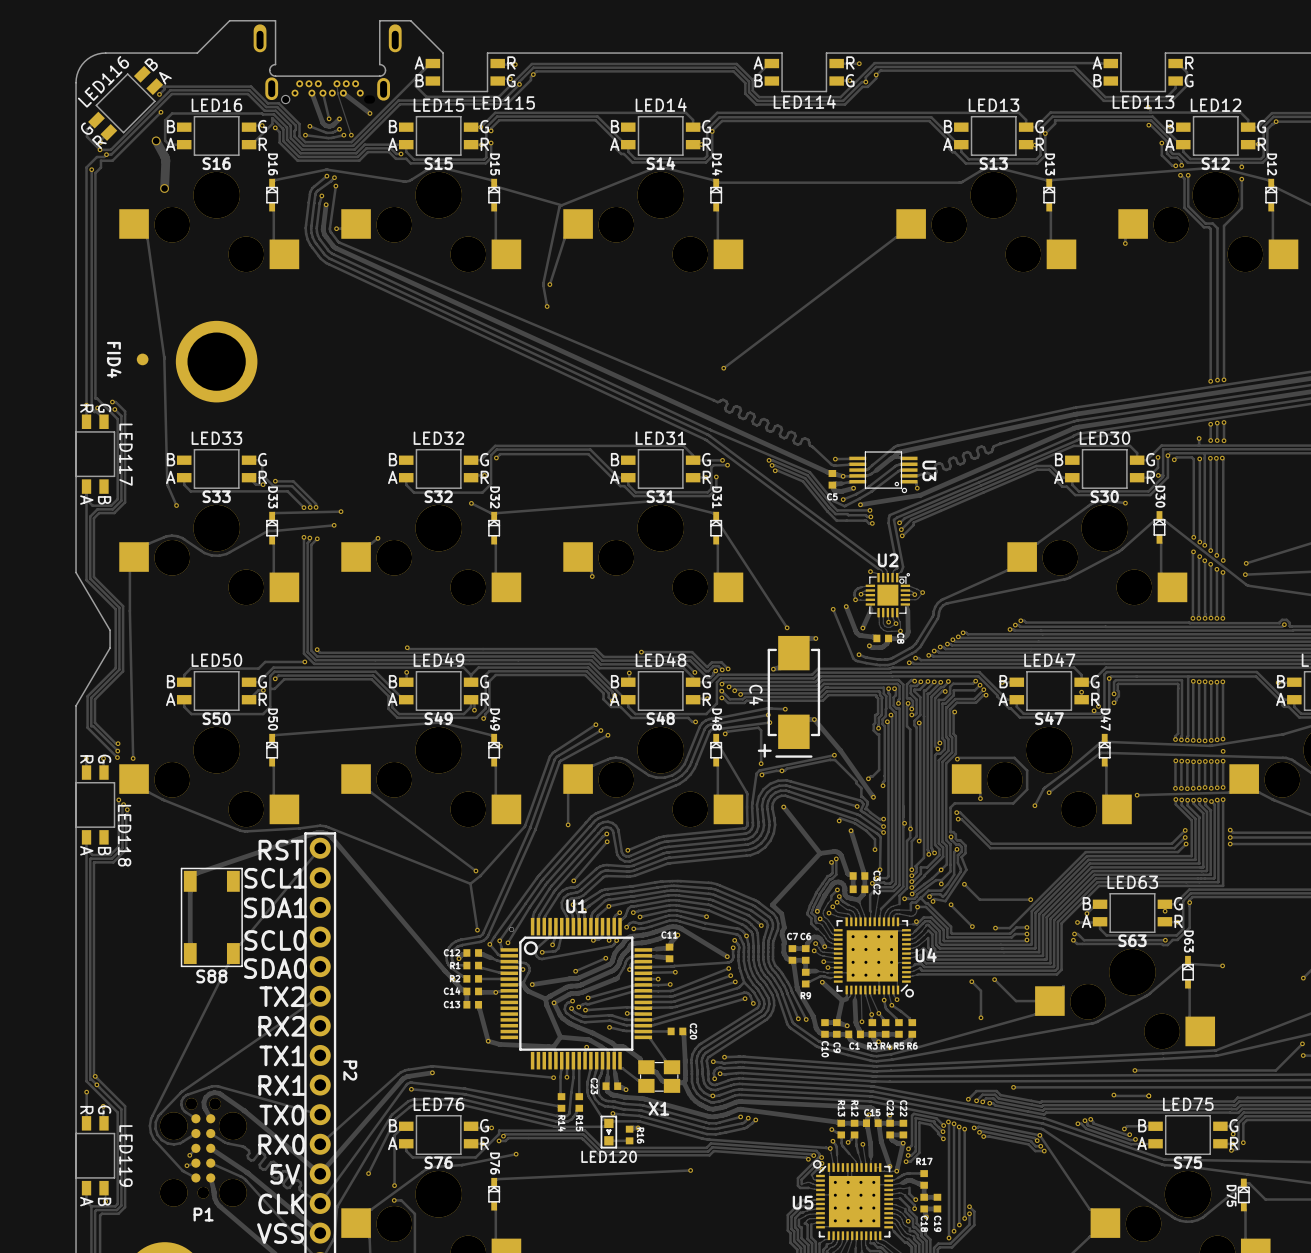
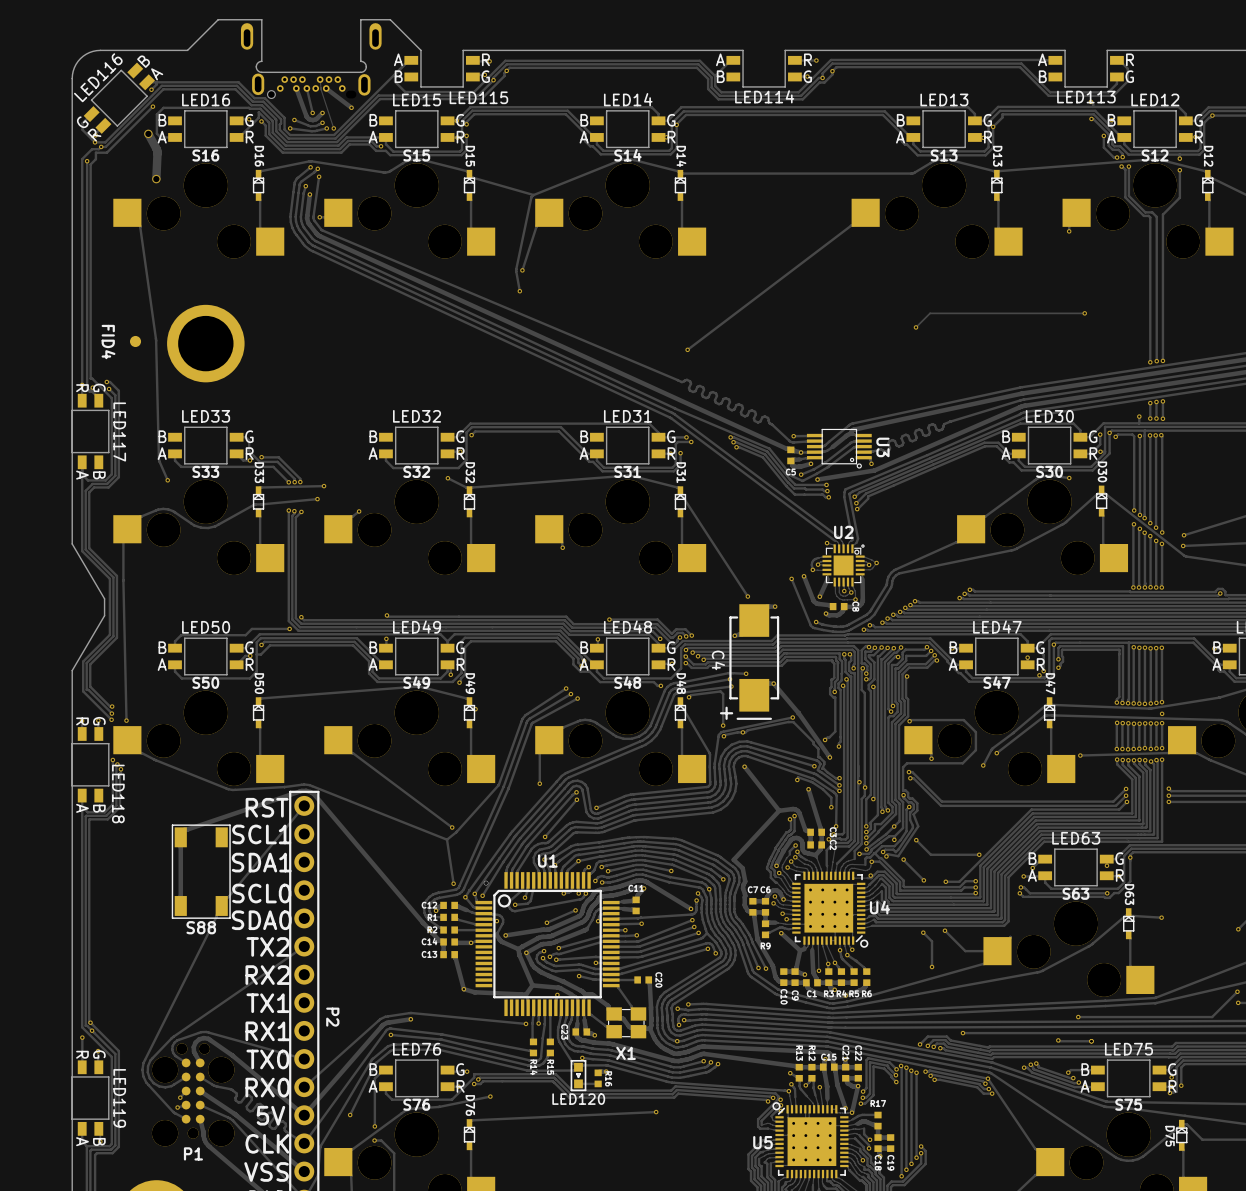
track: none -> (1084, 313) (930, 313) (915, 327)
via: none -> (1084, 313)
via: none -> (915, 327)

